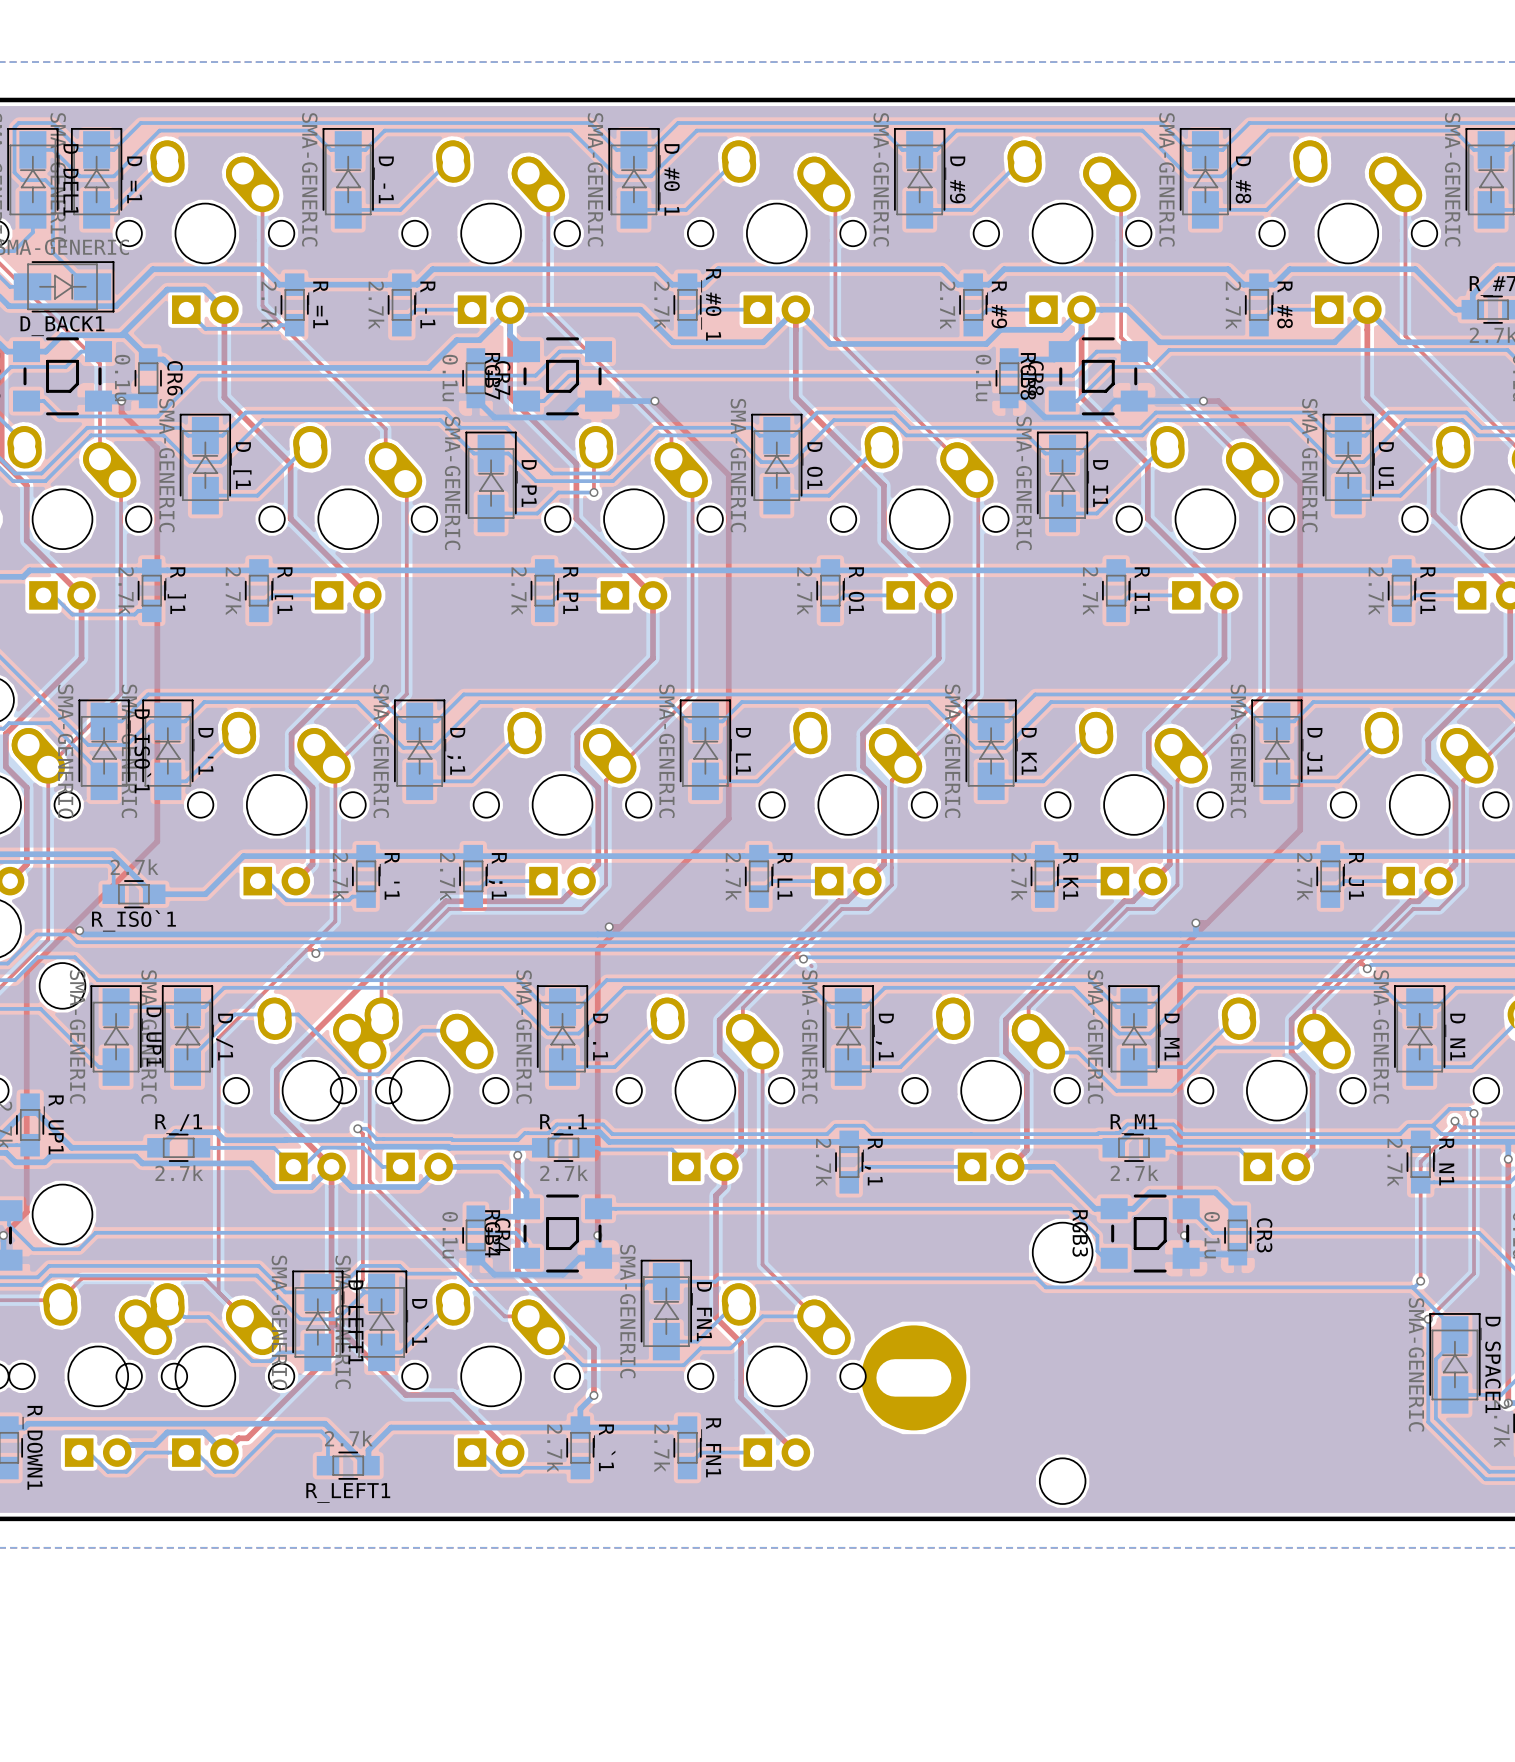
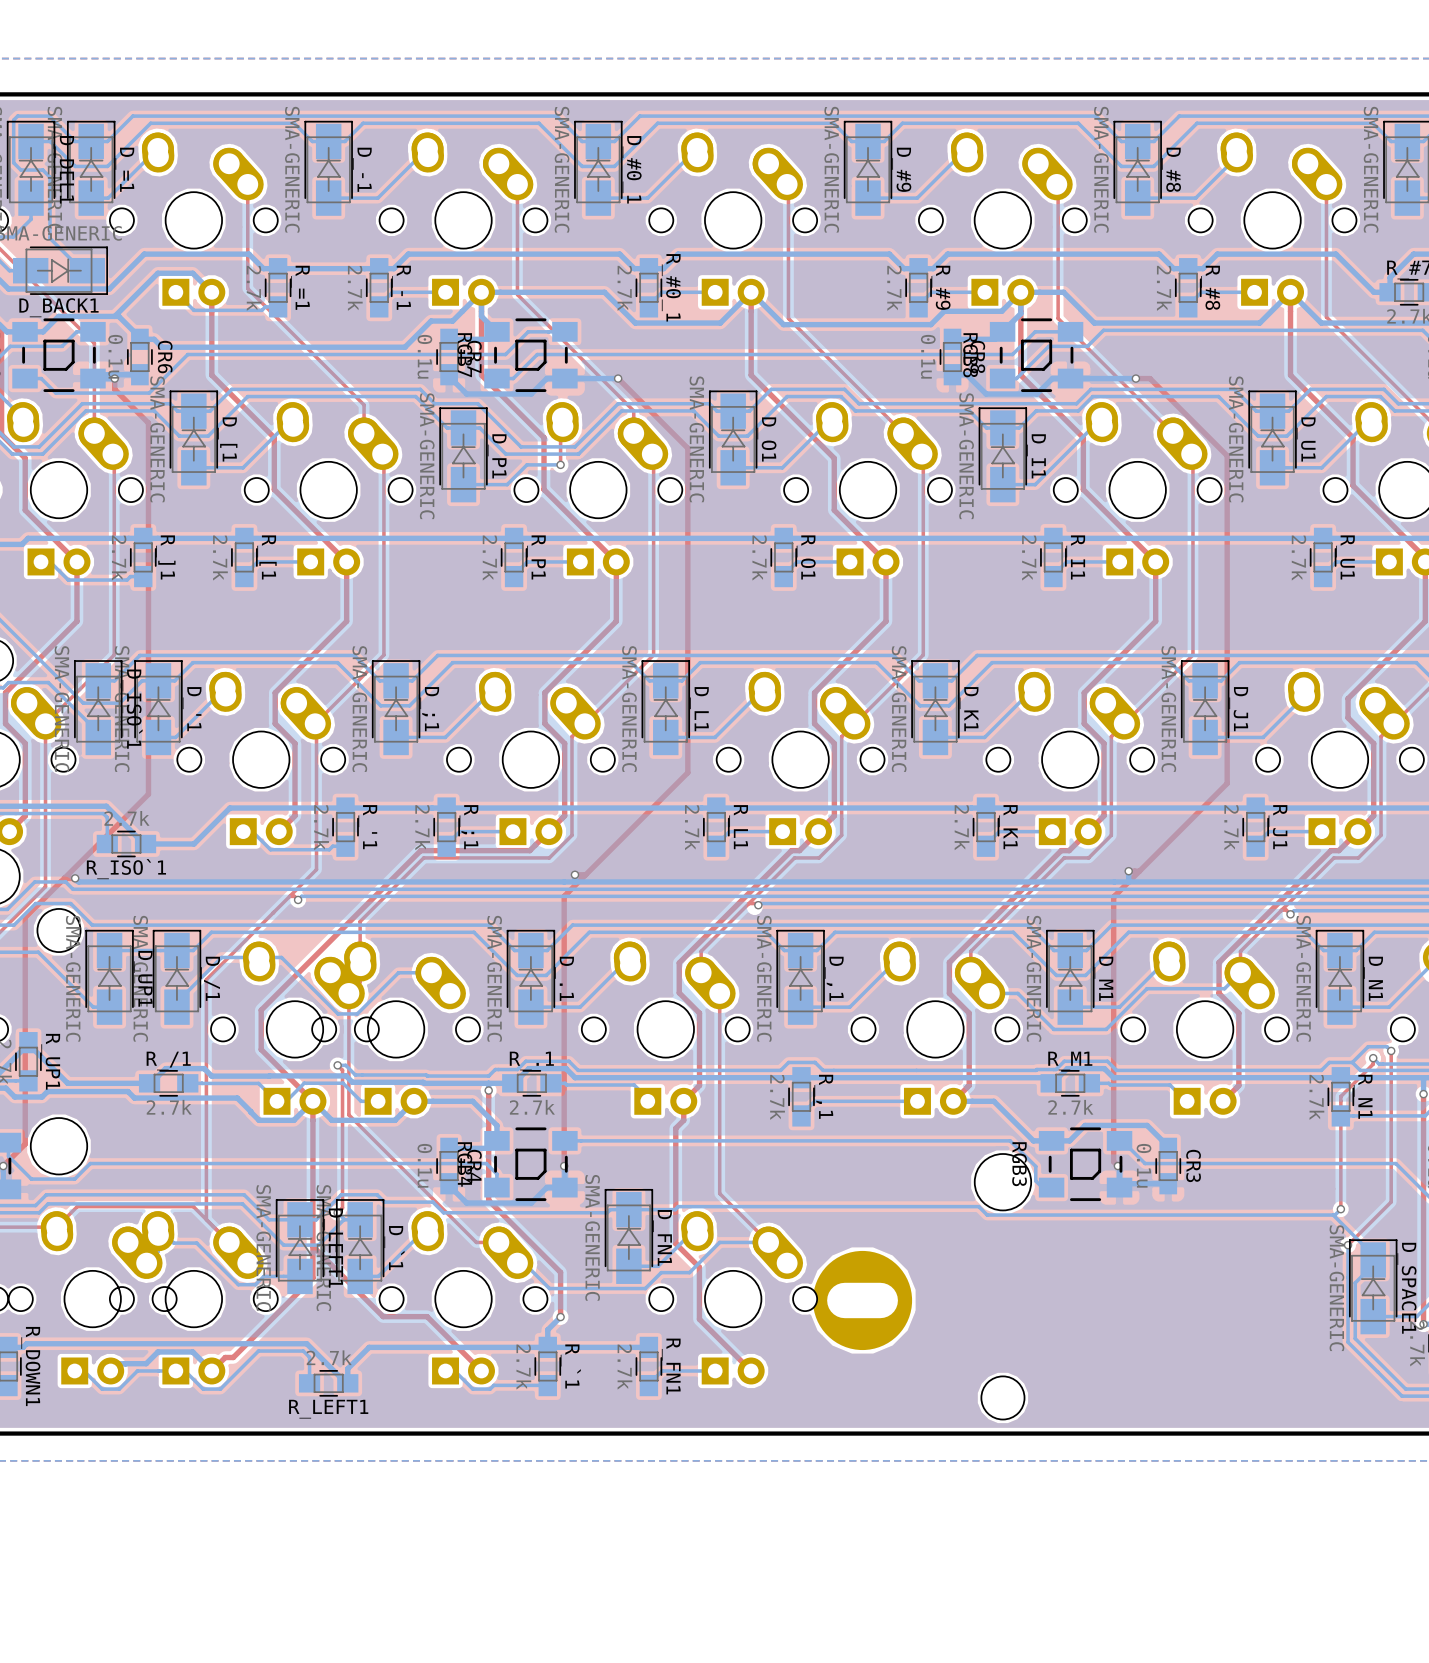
top track: (811, 965) (811, 966) -> none

